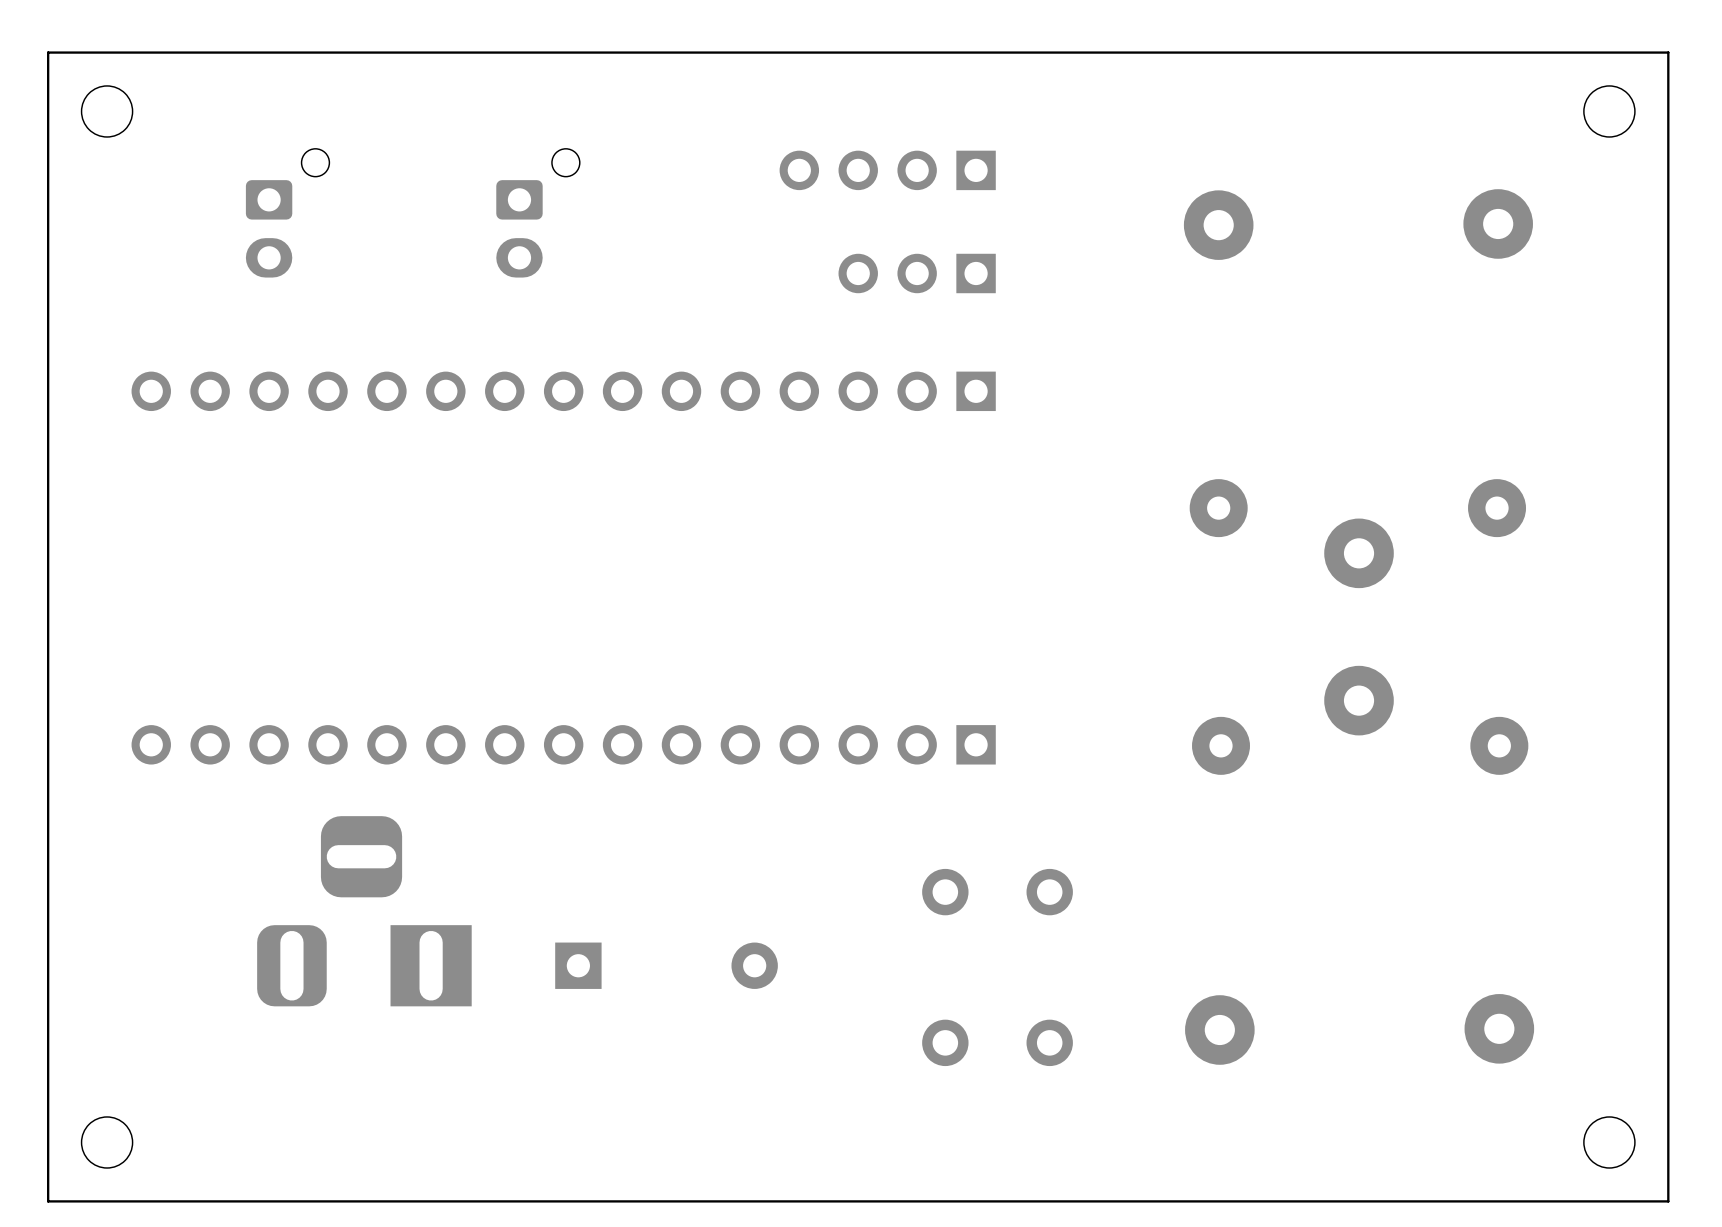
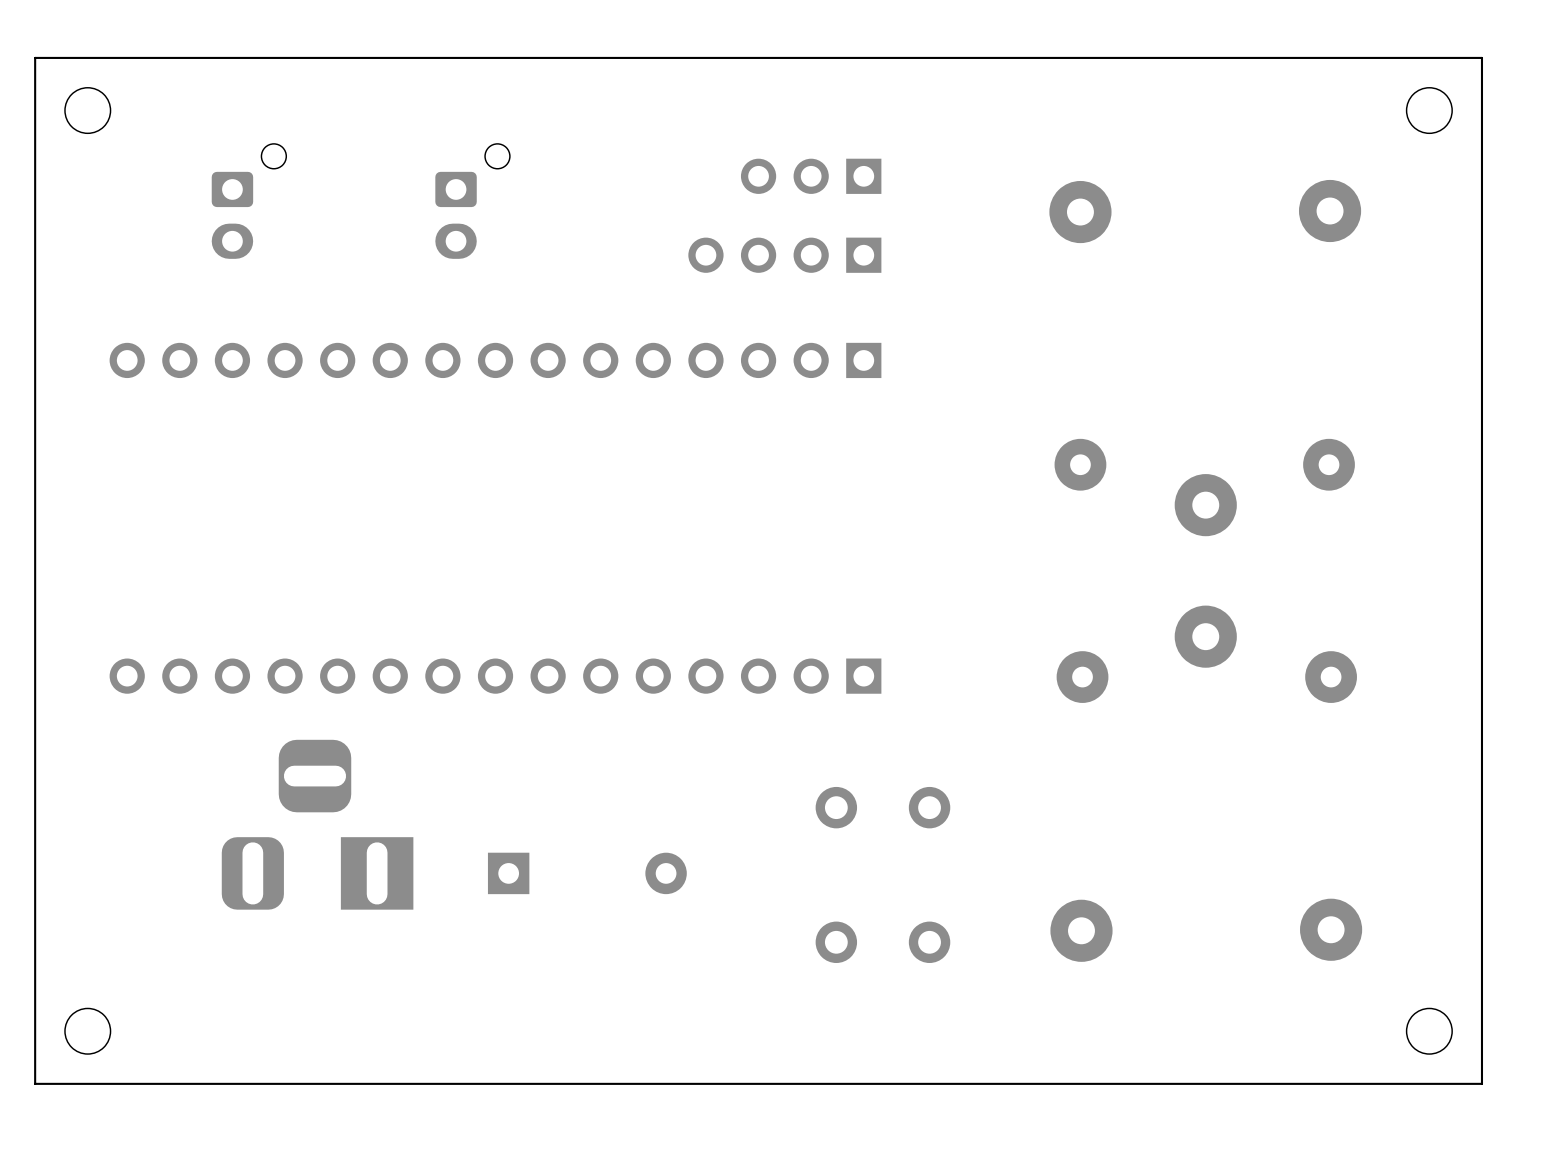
part position: (887, 170) -> (784, 255)
part position: (917, 273) -> (811, 176)

